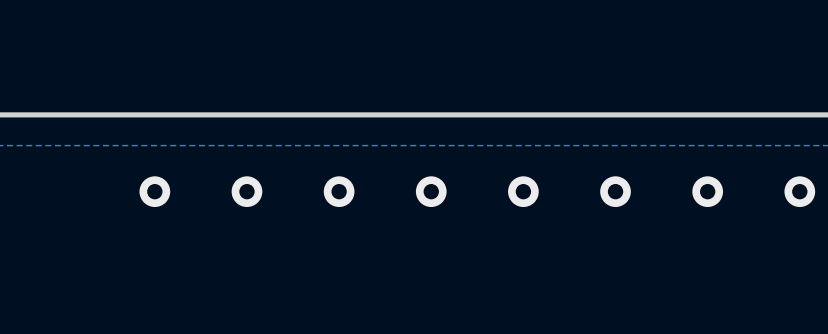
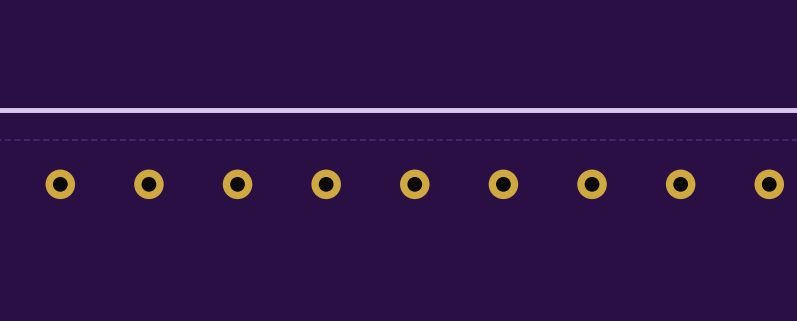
via: none -> (60, 184)

